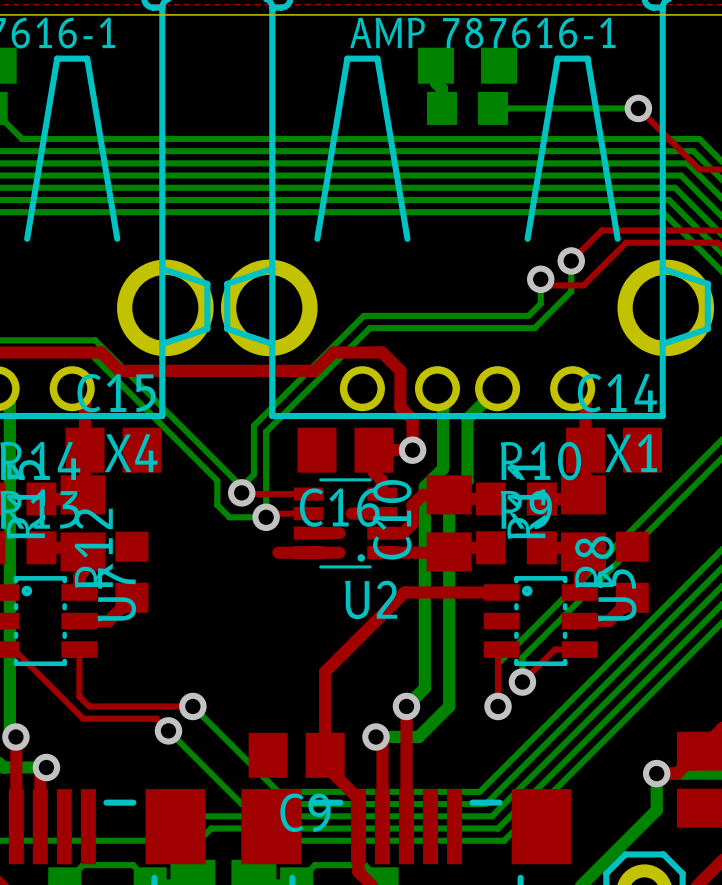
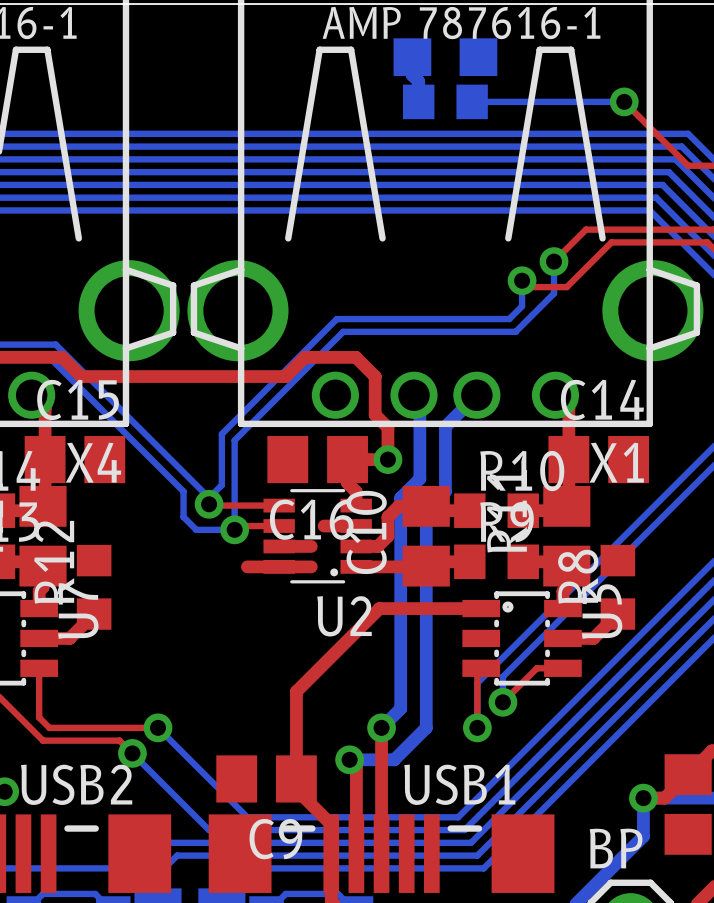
text: none -> USB2 (76, 784)
text: none -> USB1 (459, 784)
text: none -> BP (616, 848)

